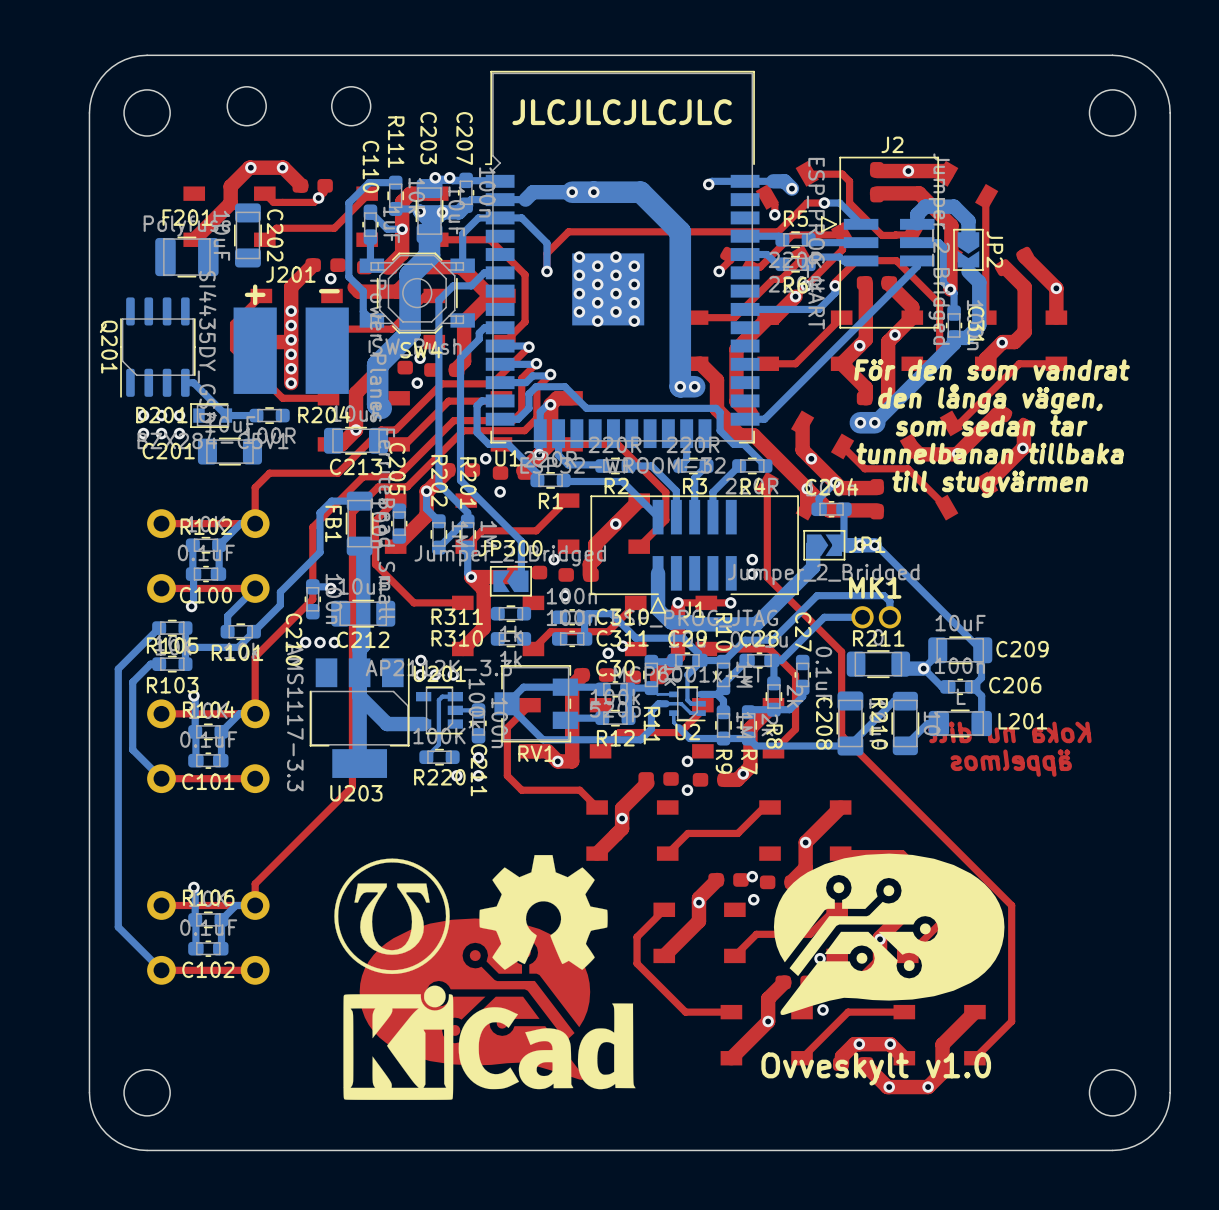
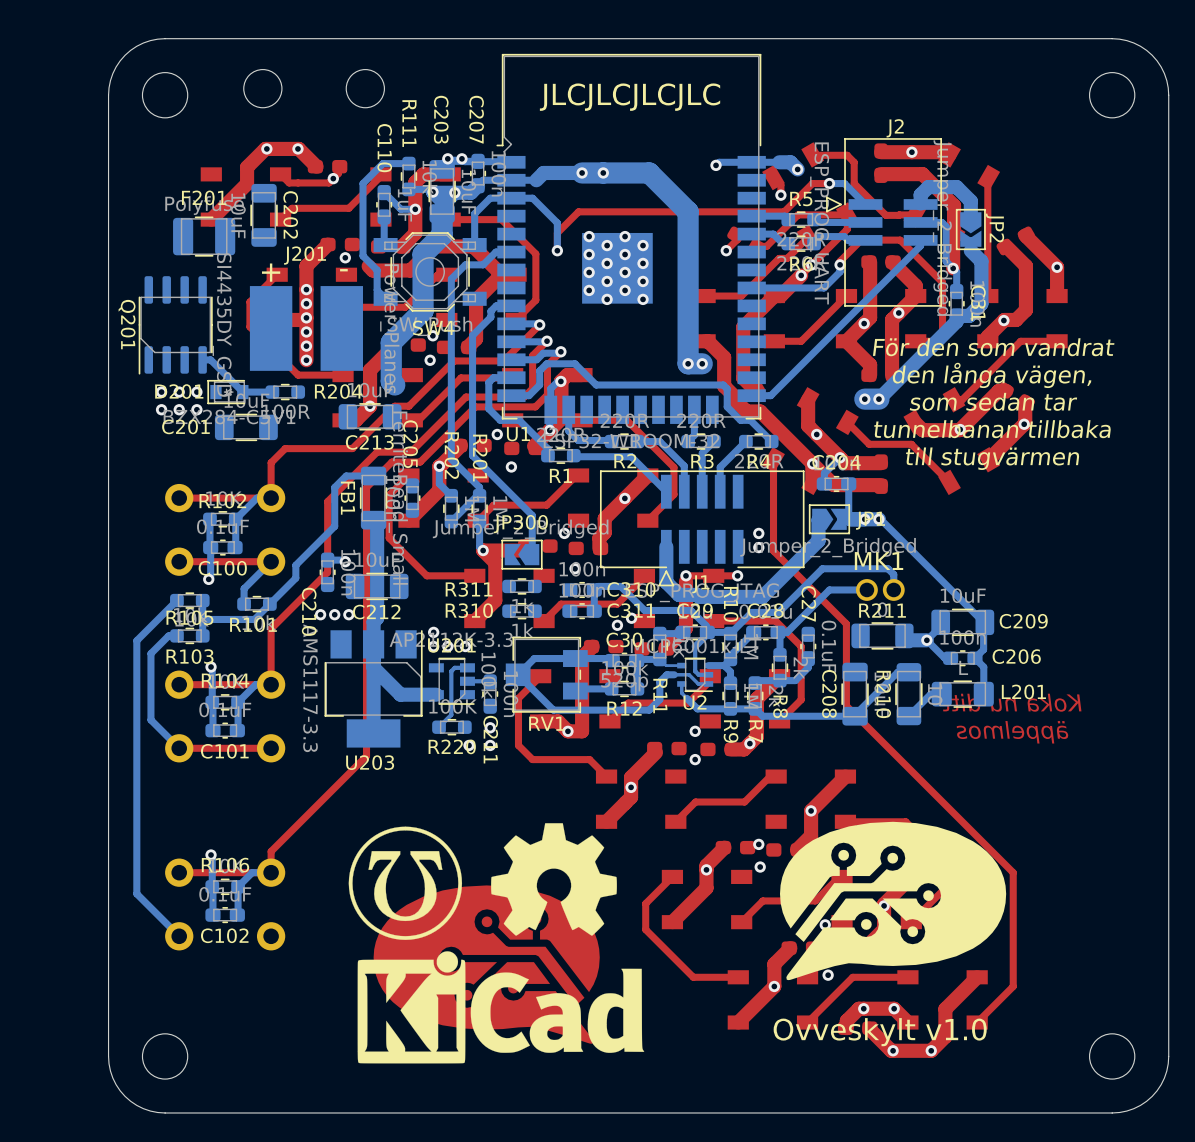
top track: (255, 970) (161, 970) -> none

